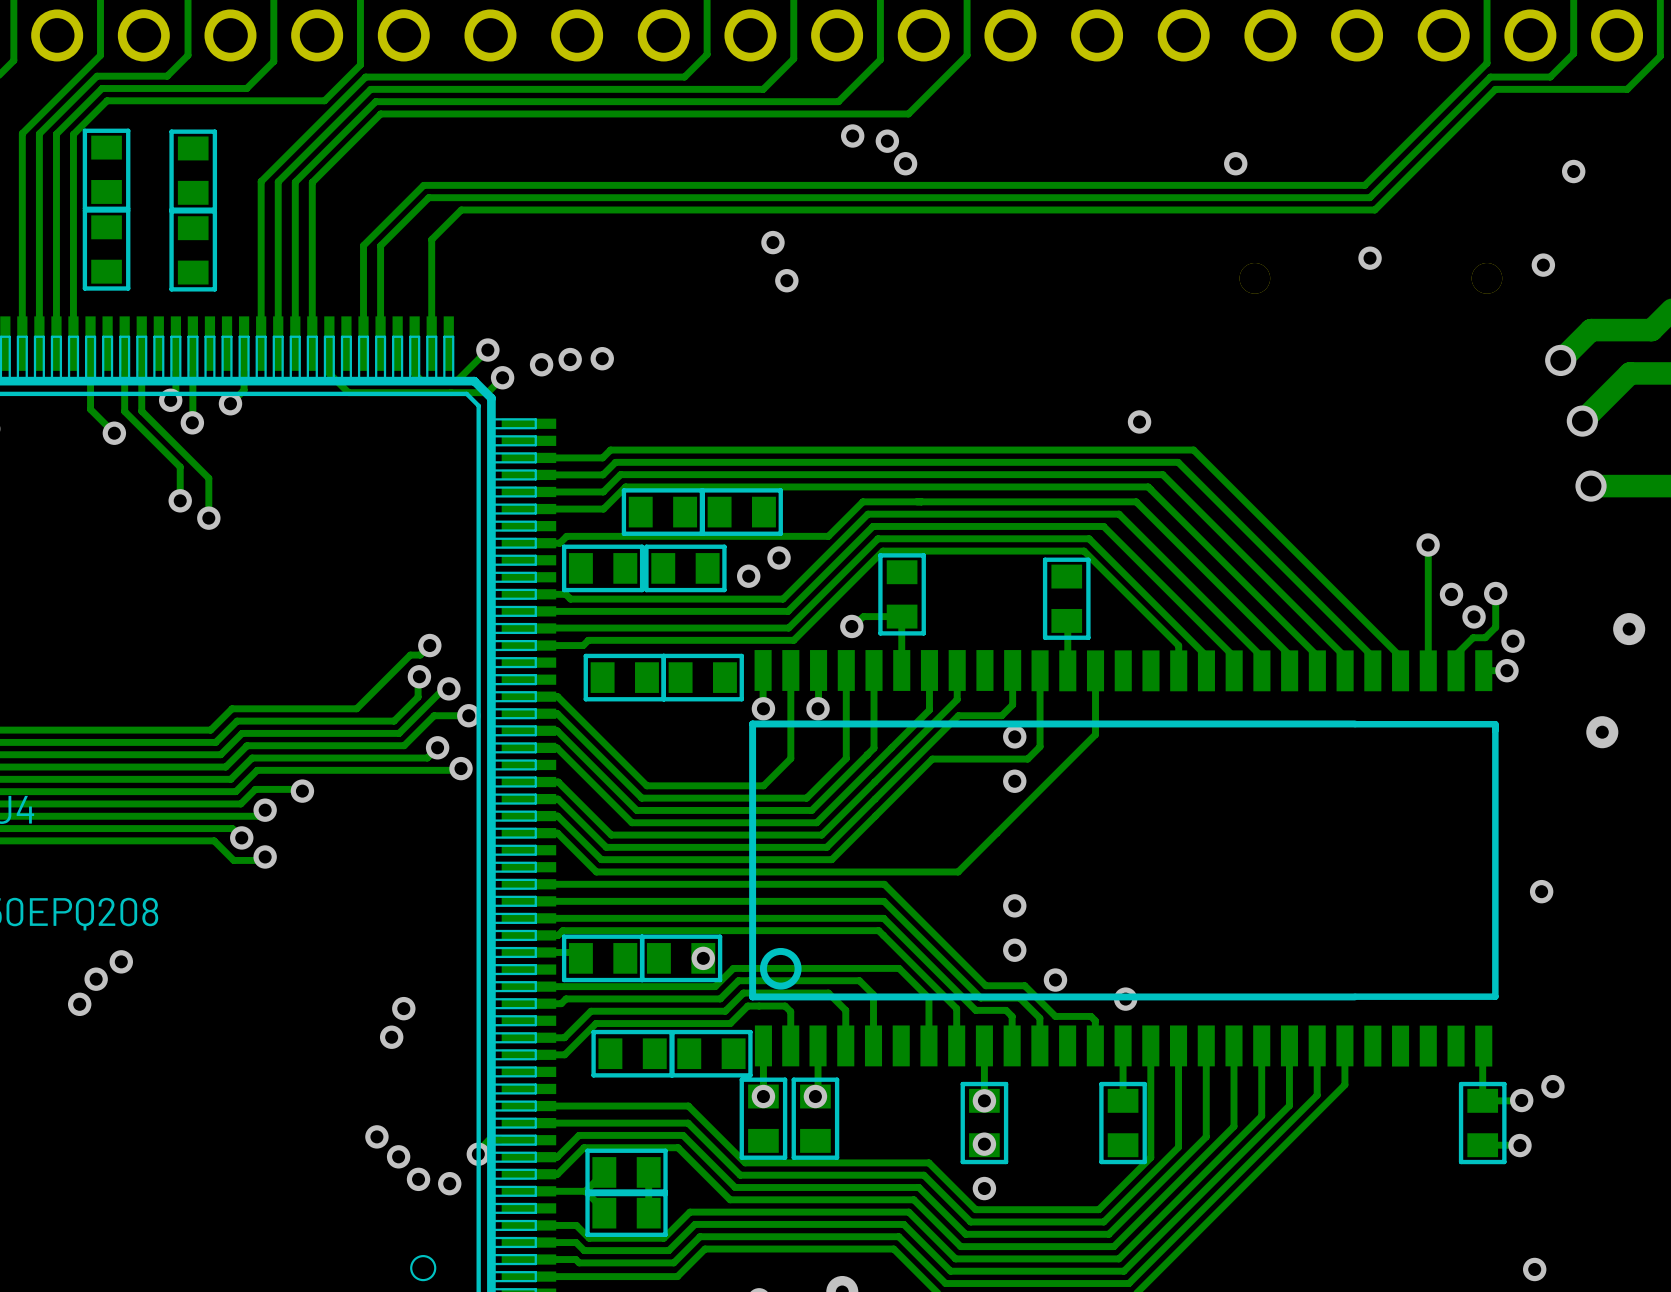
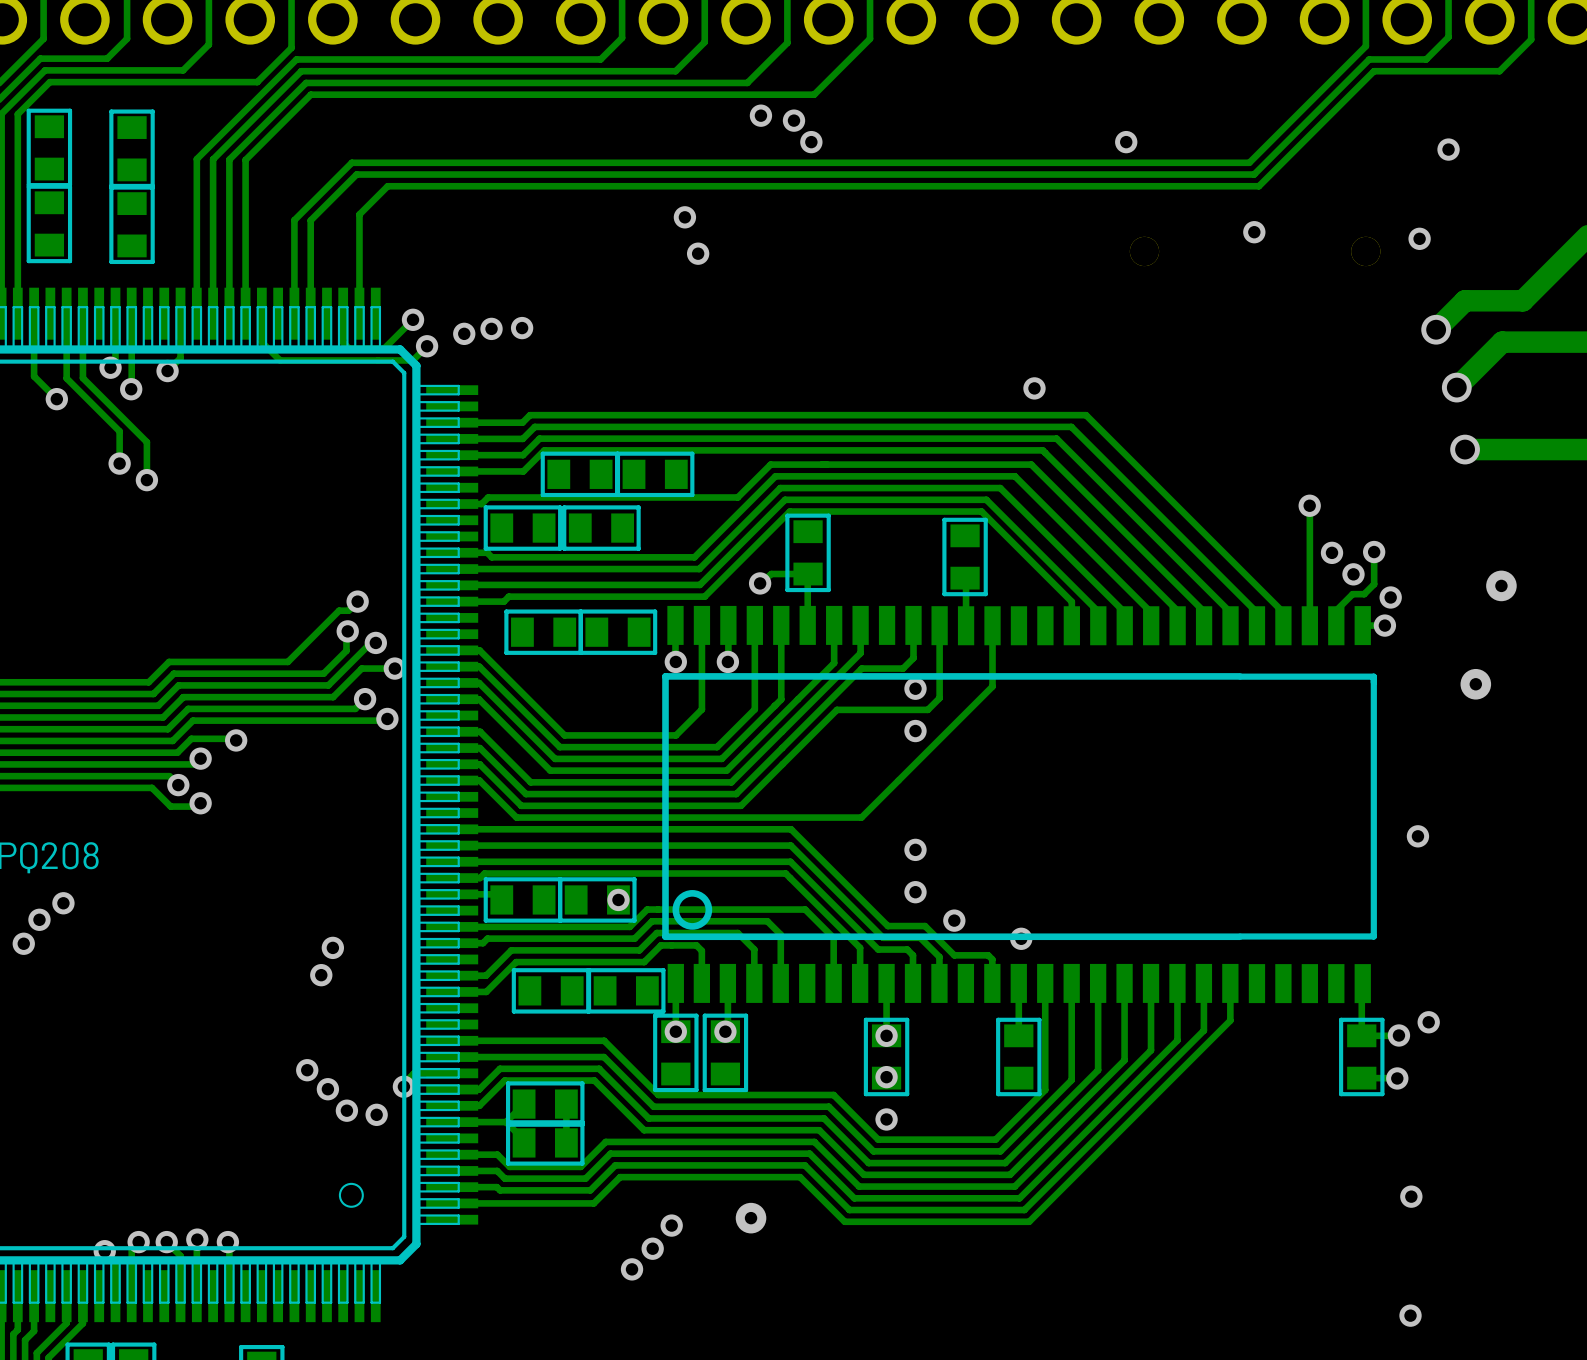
via: (779, 558) -> none
via: (748, 576) -> none

